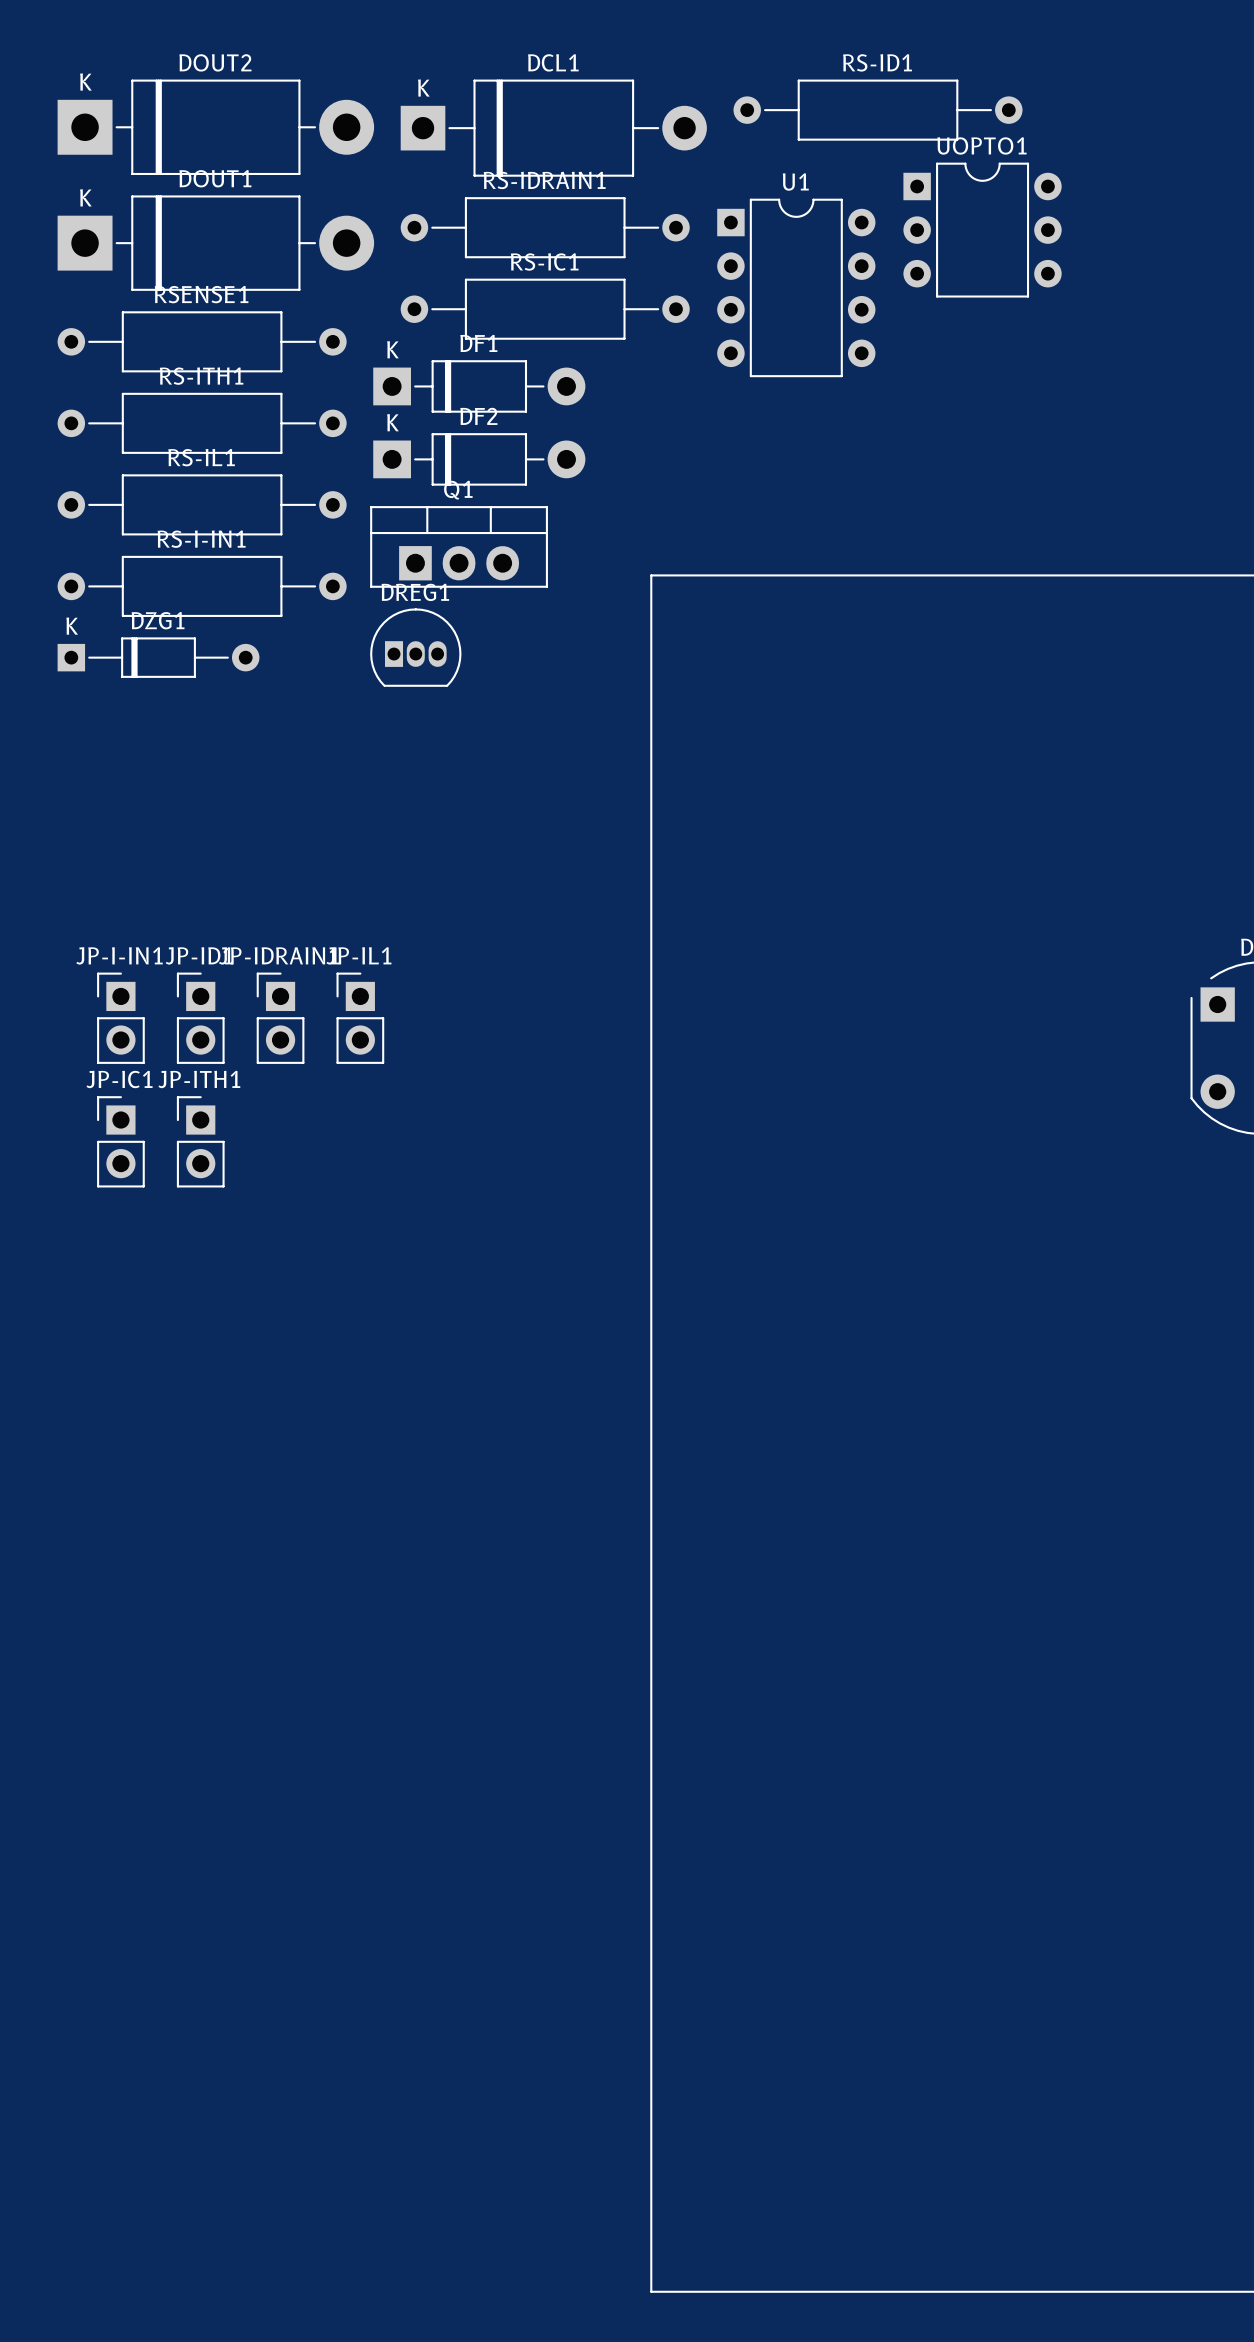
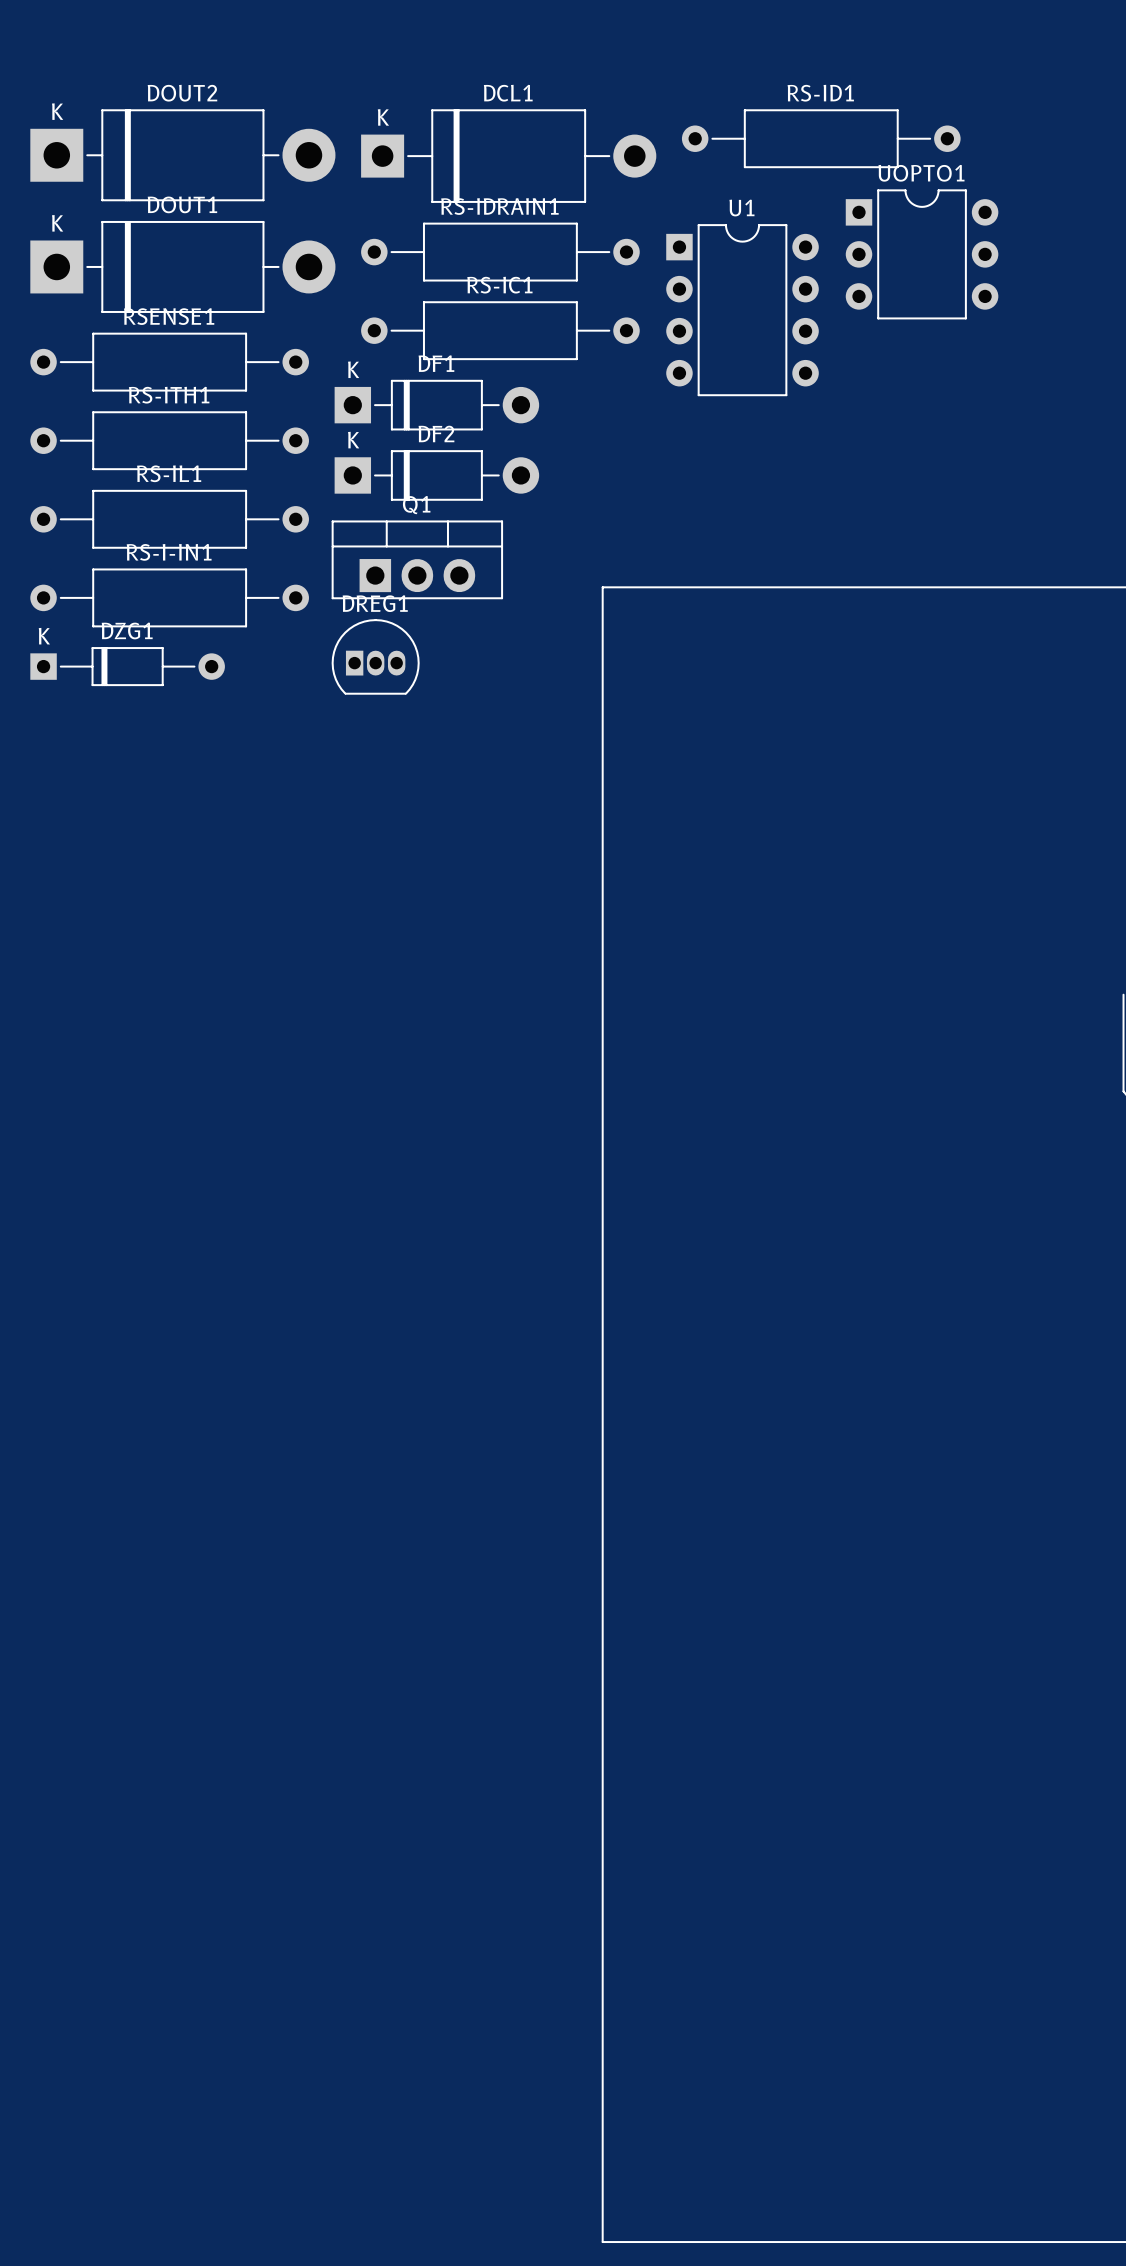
JP-I-IN1: (120, 1018) -> none
JP-ID1: (200, 1018) -> none
JP-IDRAIN1: (280, 1018) -> none
JP-IL1: (360, 1018) -> none
JP-IC1: (120, 1141) -> none
JP-ITH1: (200, 1141) -> none

